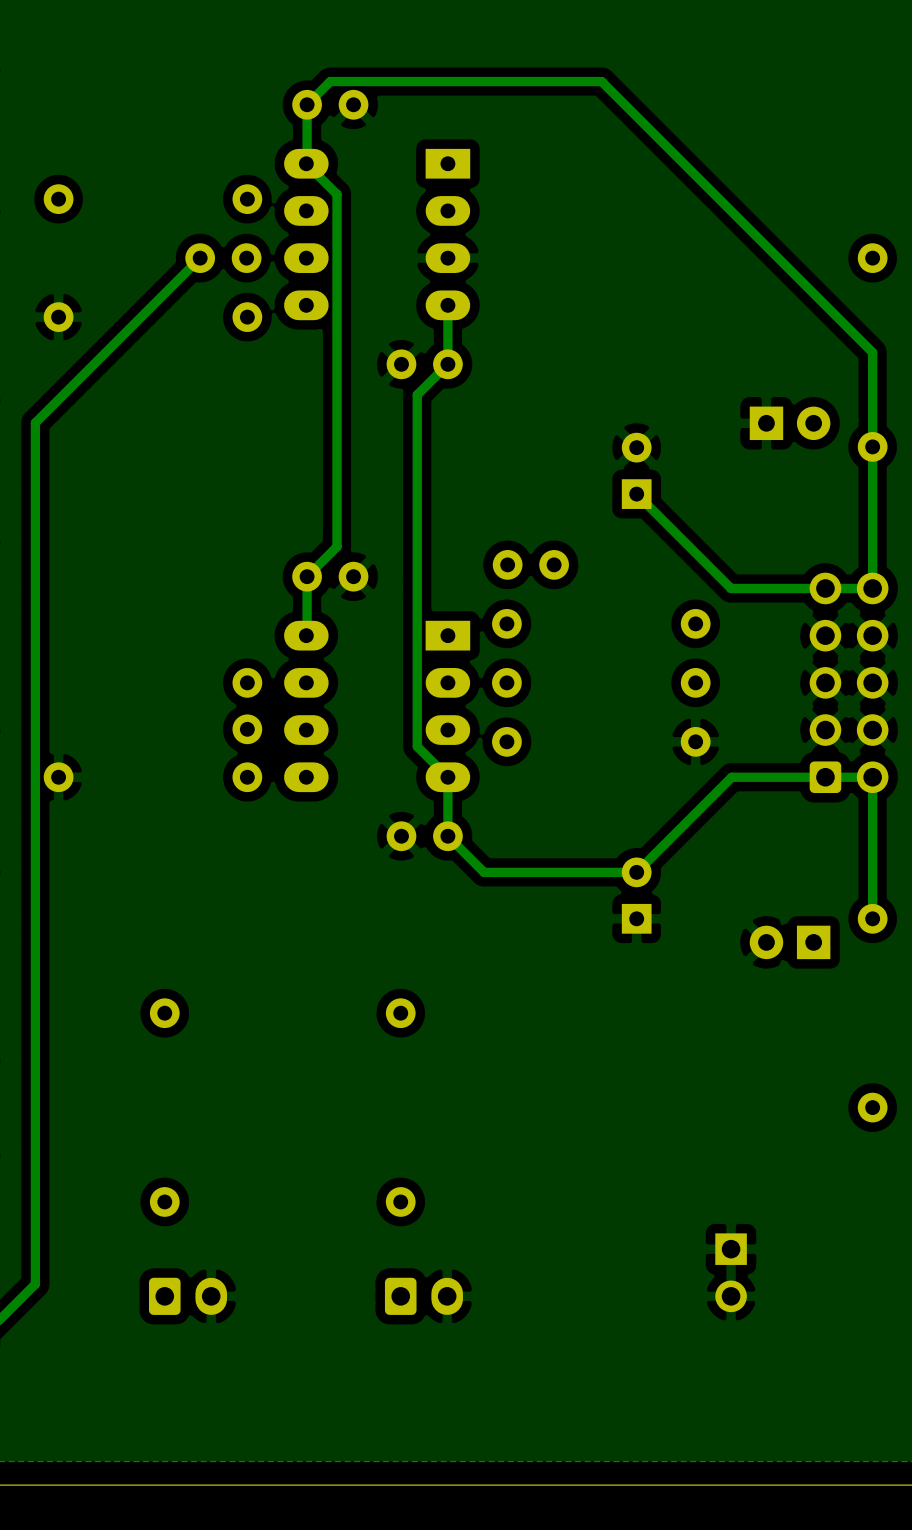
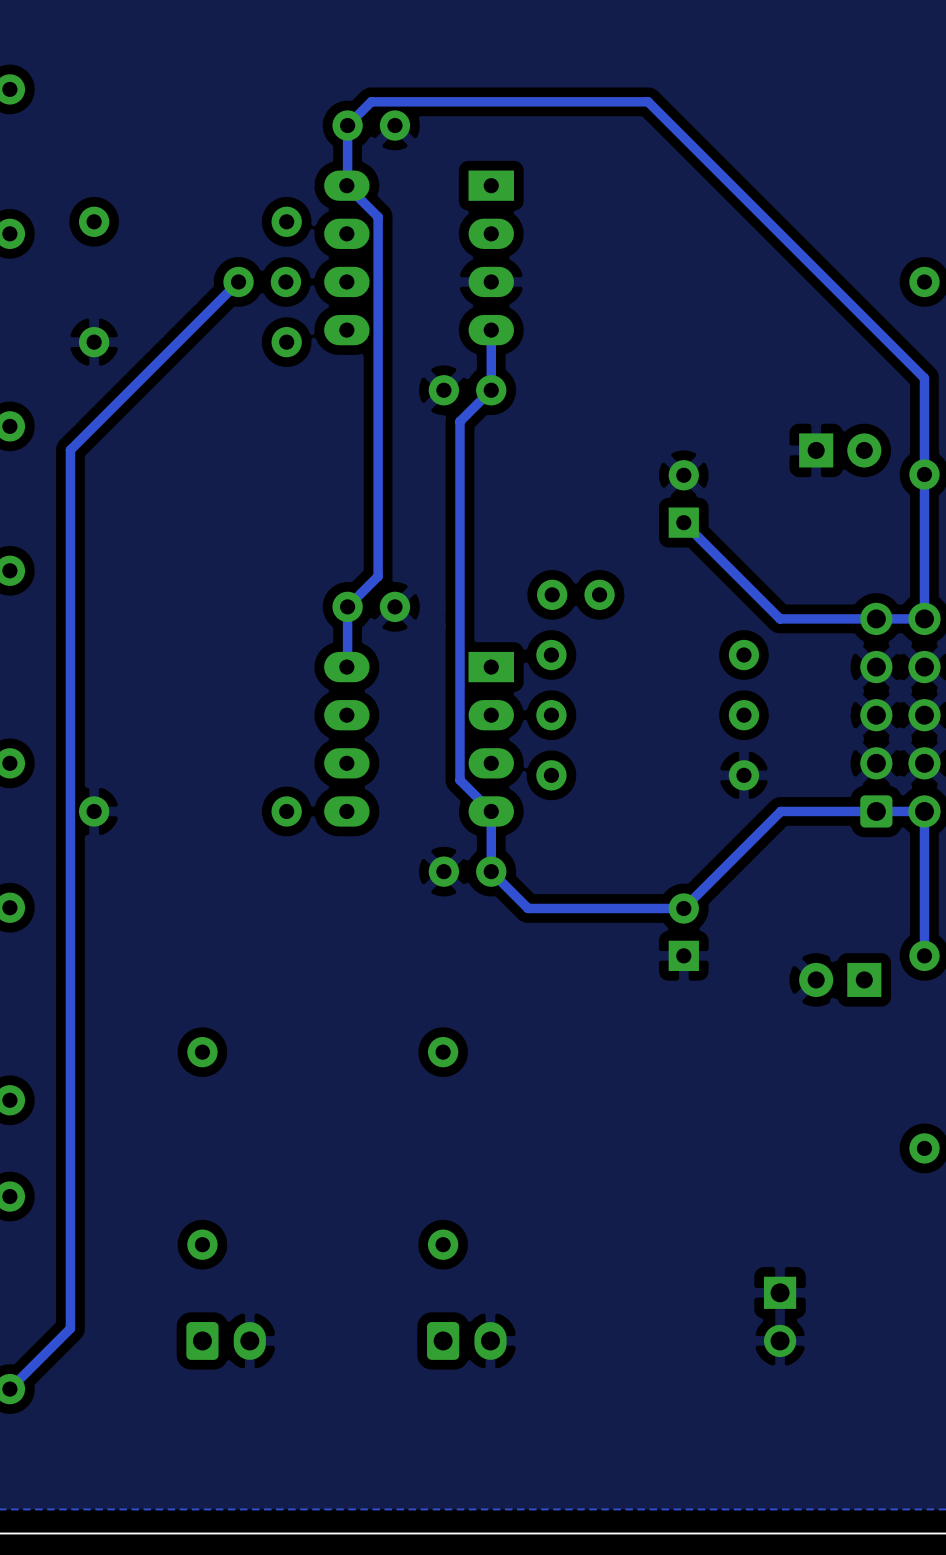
part: (247, 706) -> none

